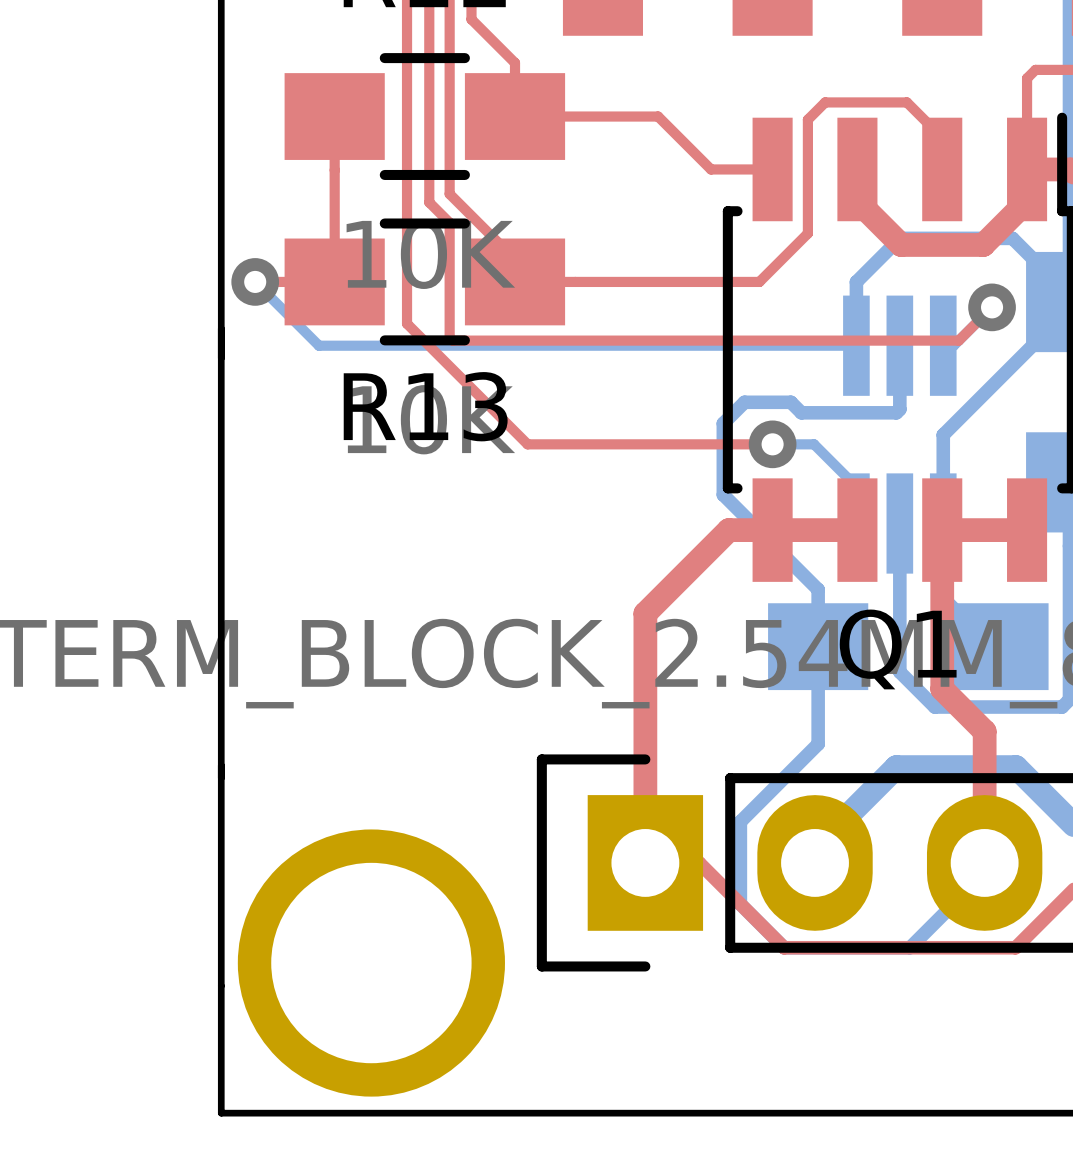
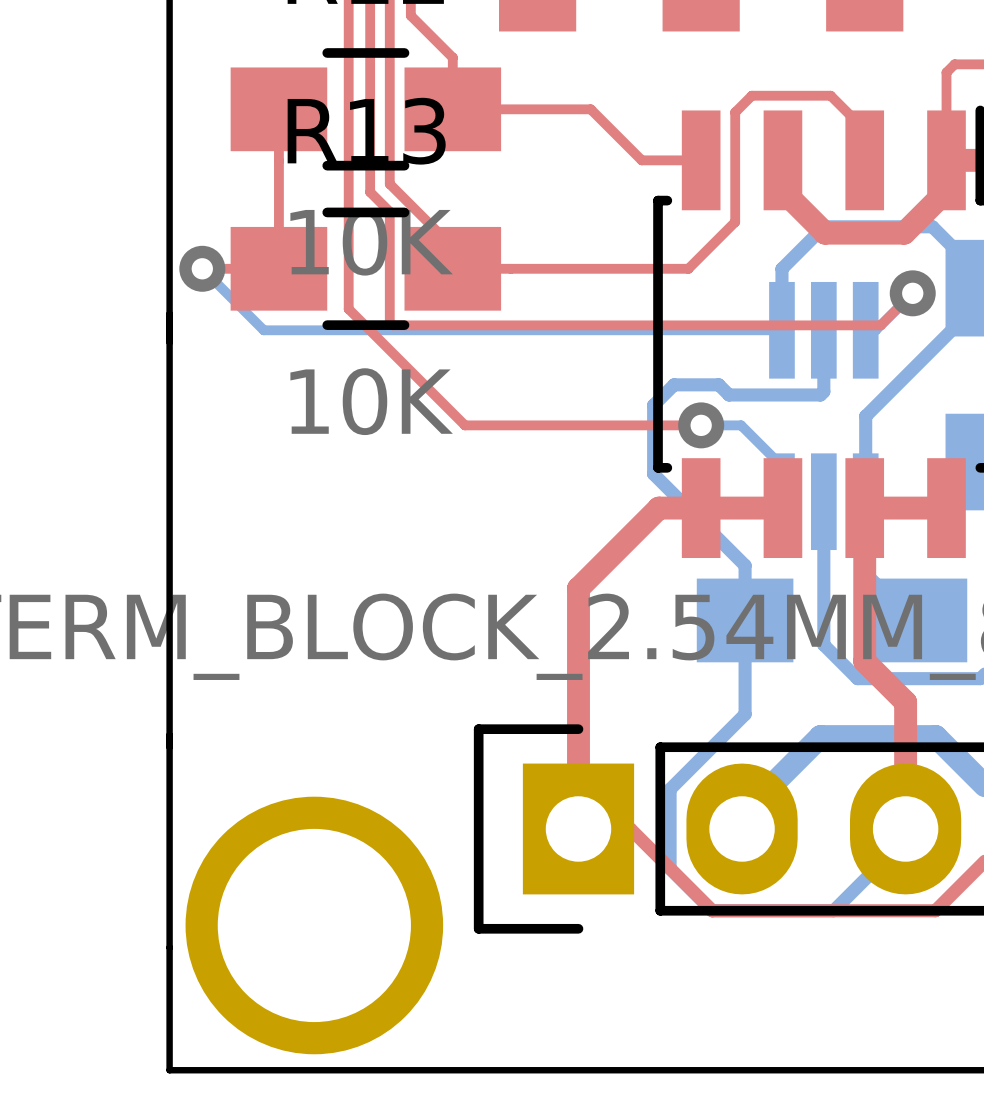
R13 name position: R13 (425, 406) -> R13 (366, 131)
Q1 name: Q1 (898, 649) -> none

